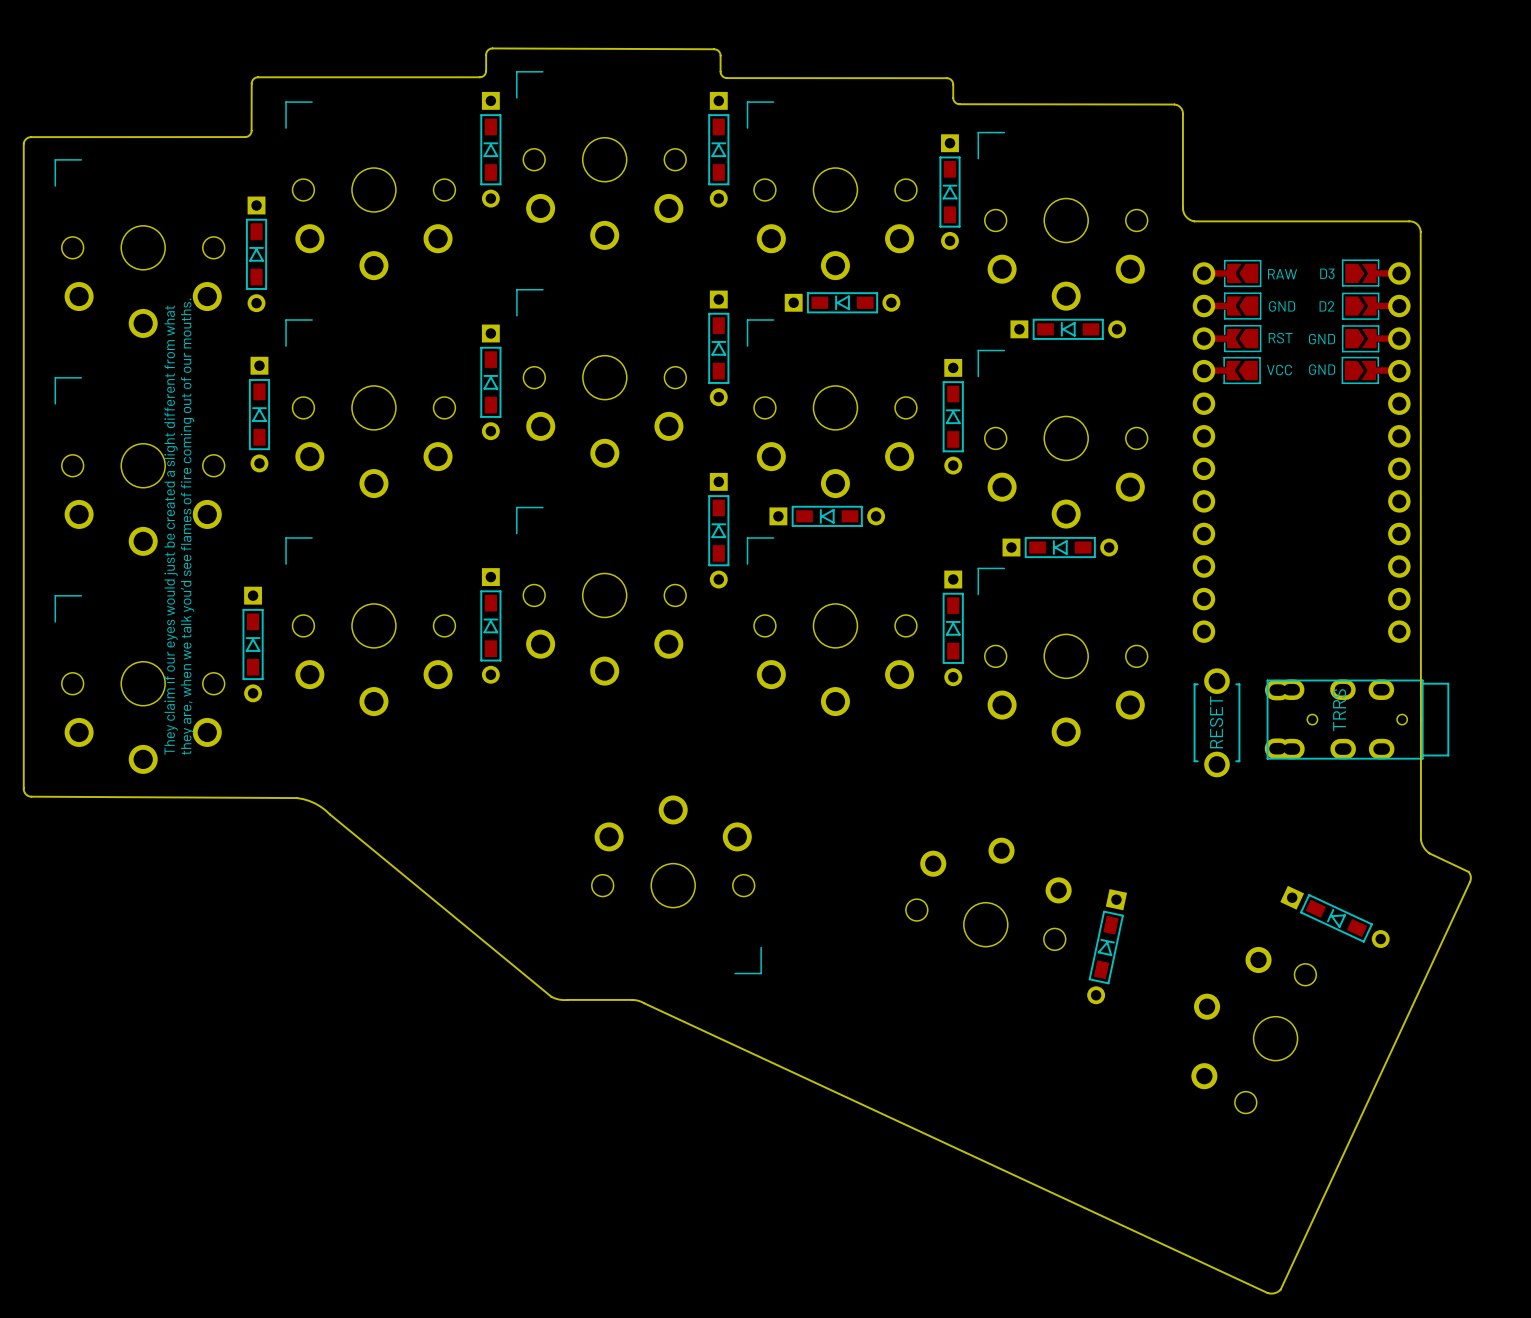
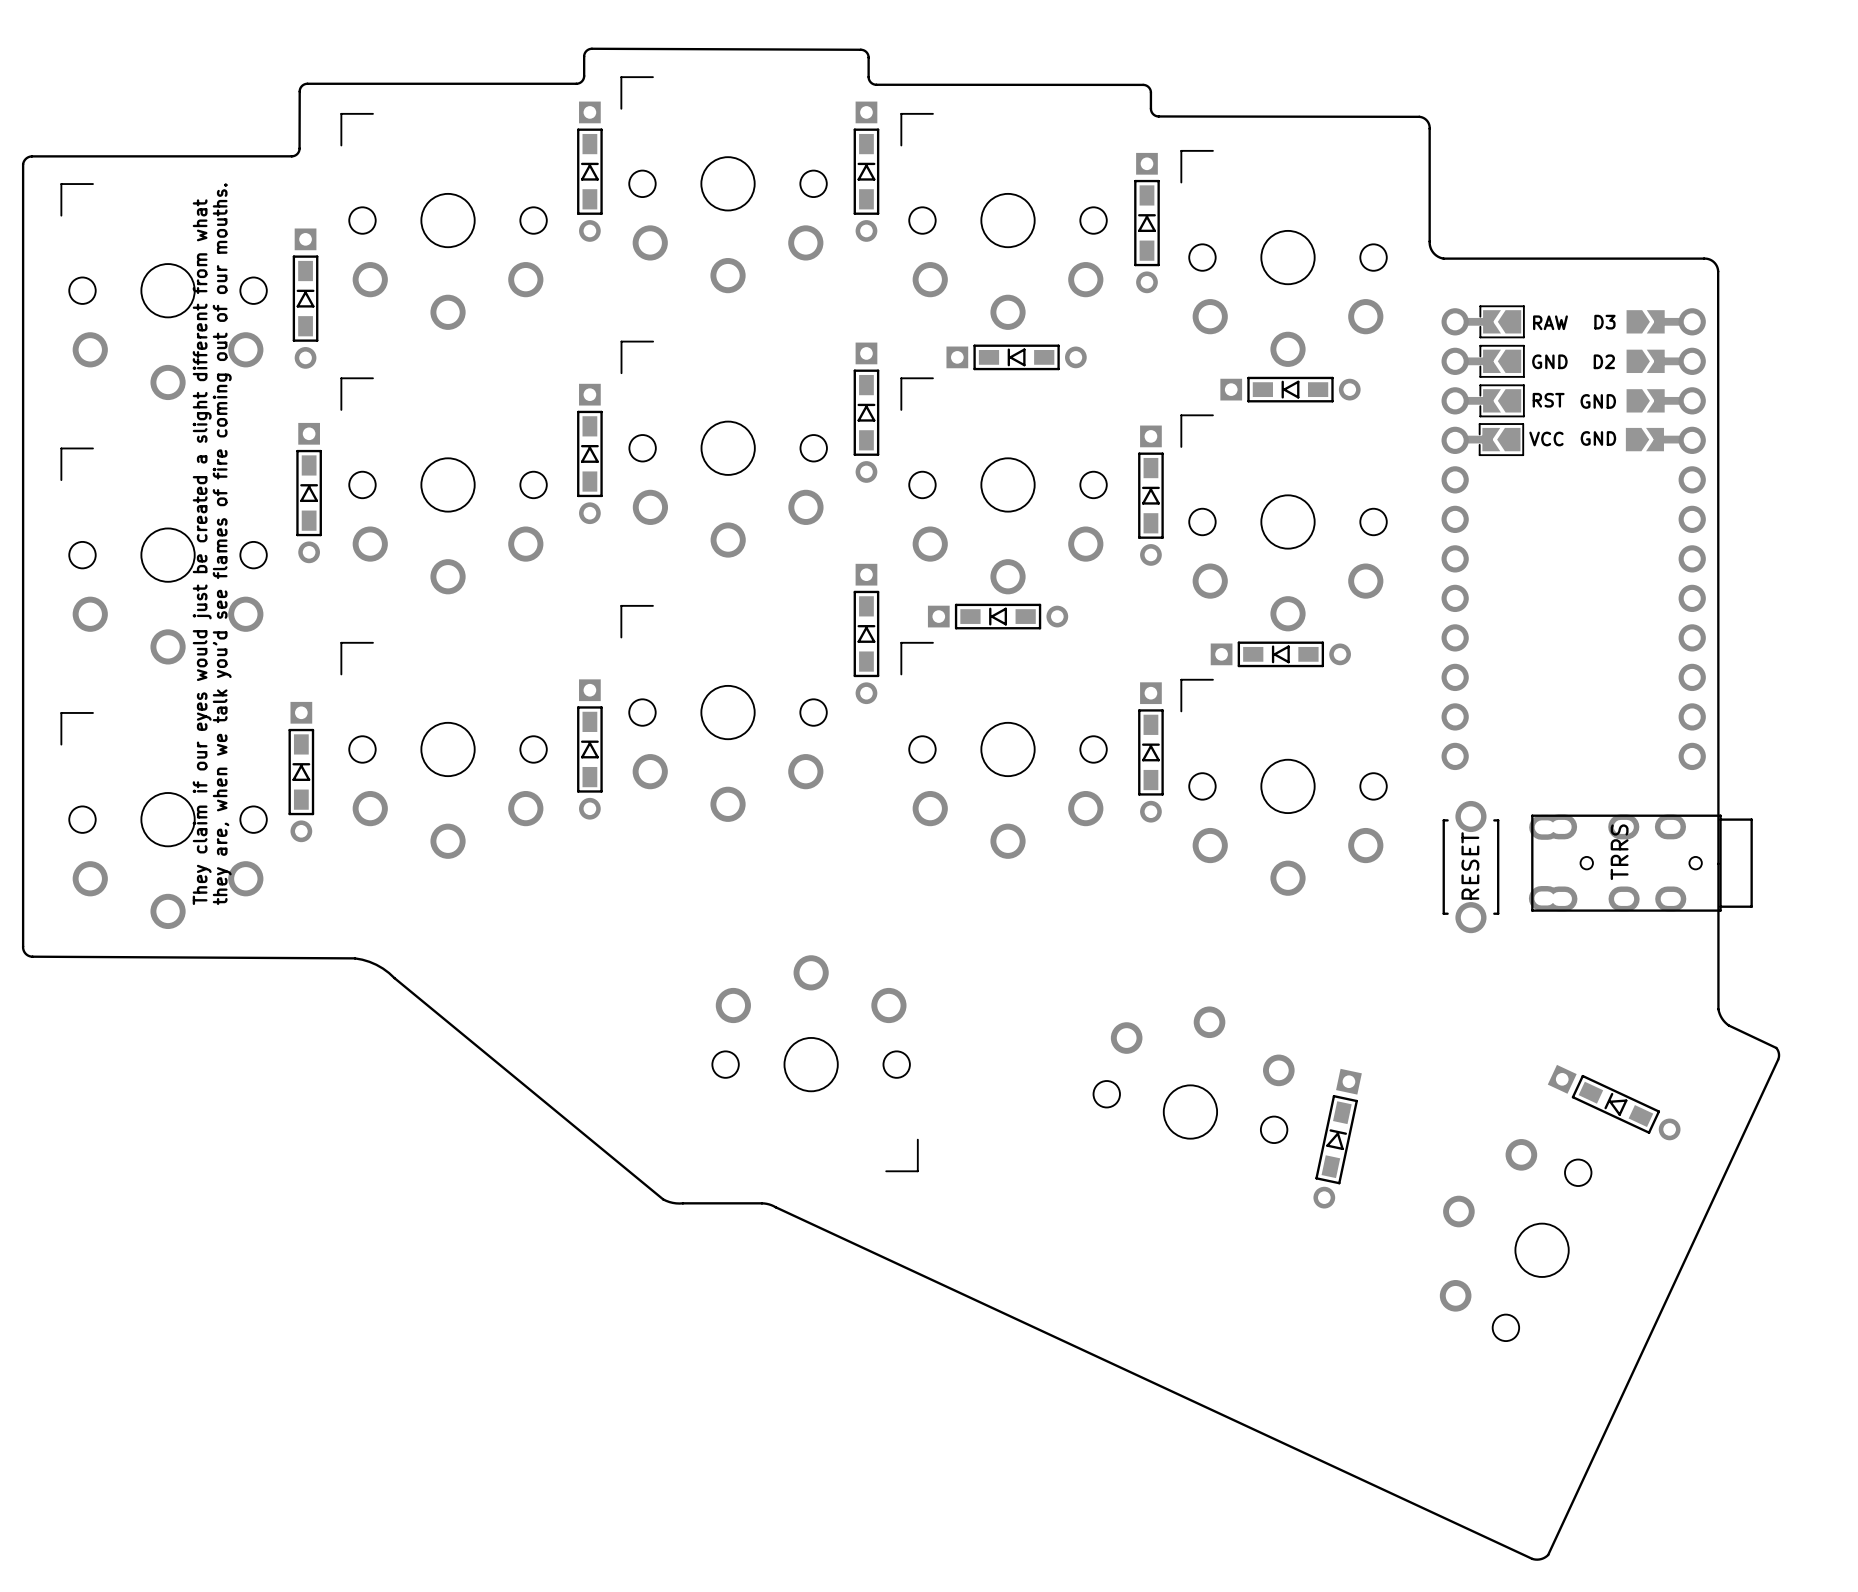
part footprint: [1192, 259, 1411, 643] -> [1441, 305, 1706, 771]

